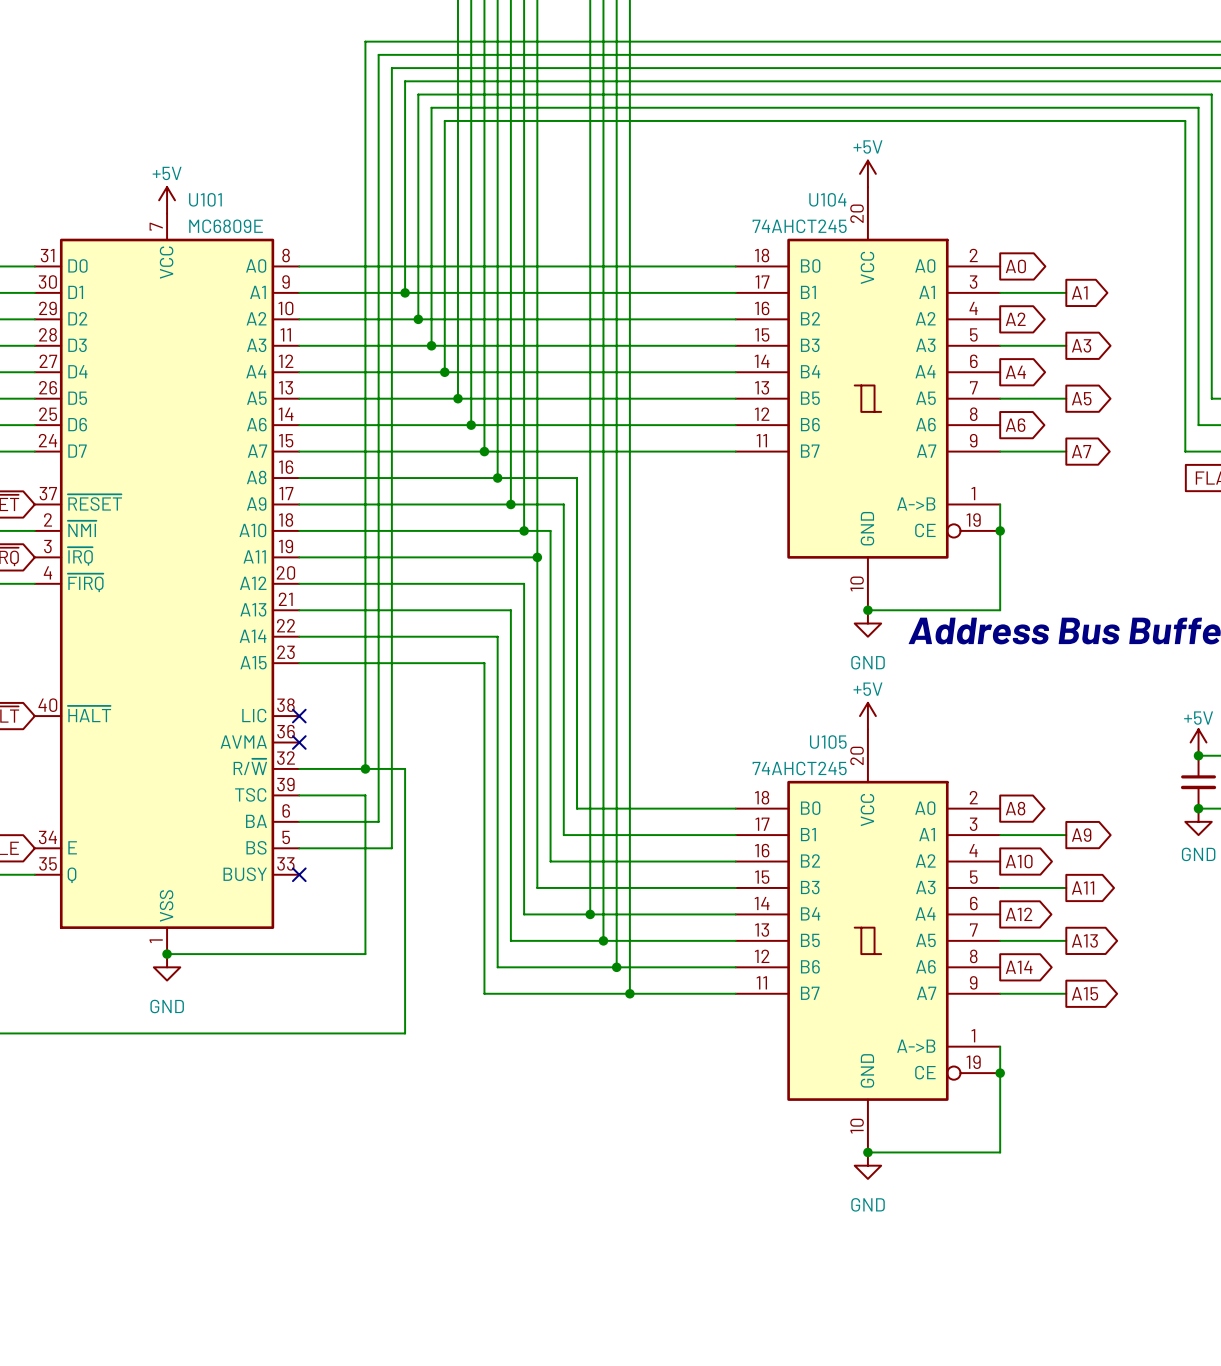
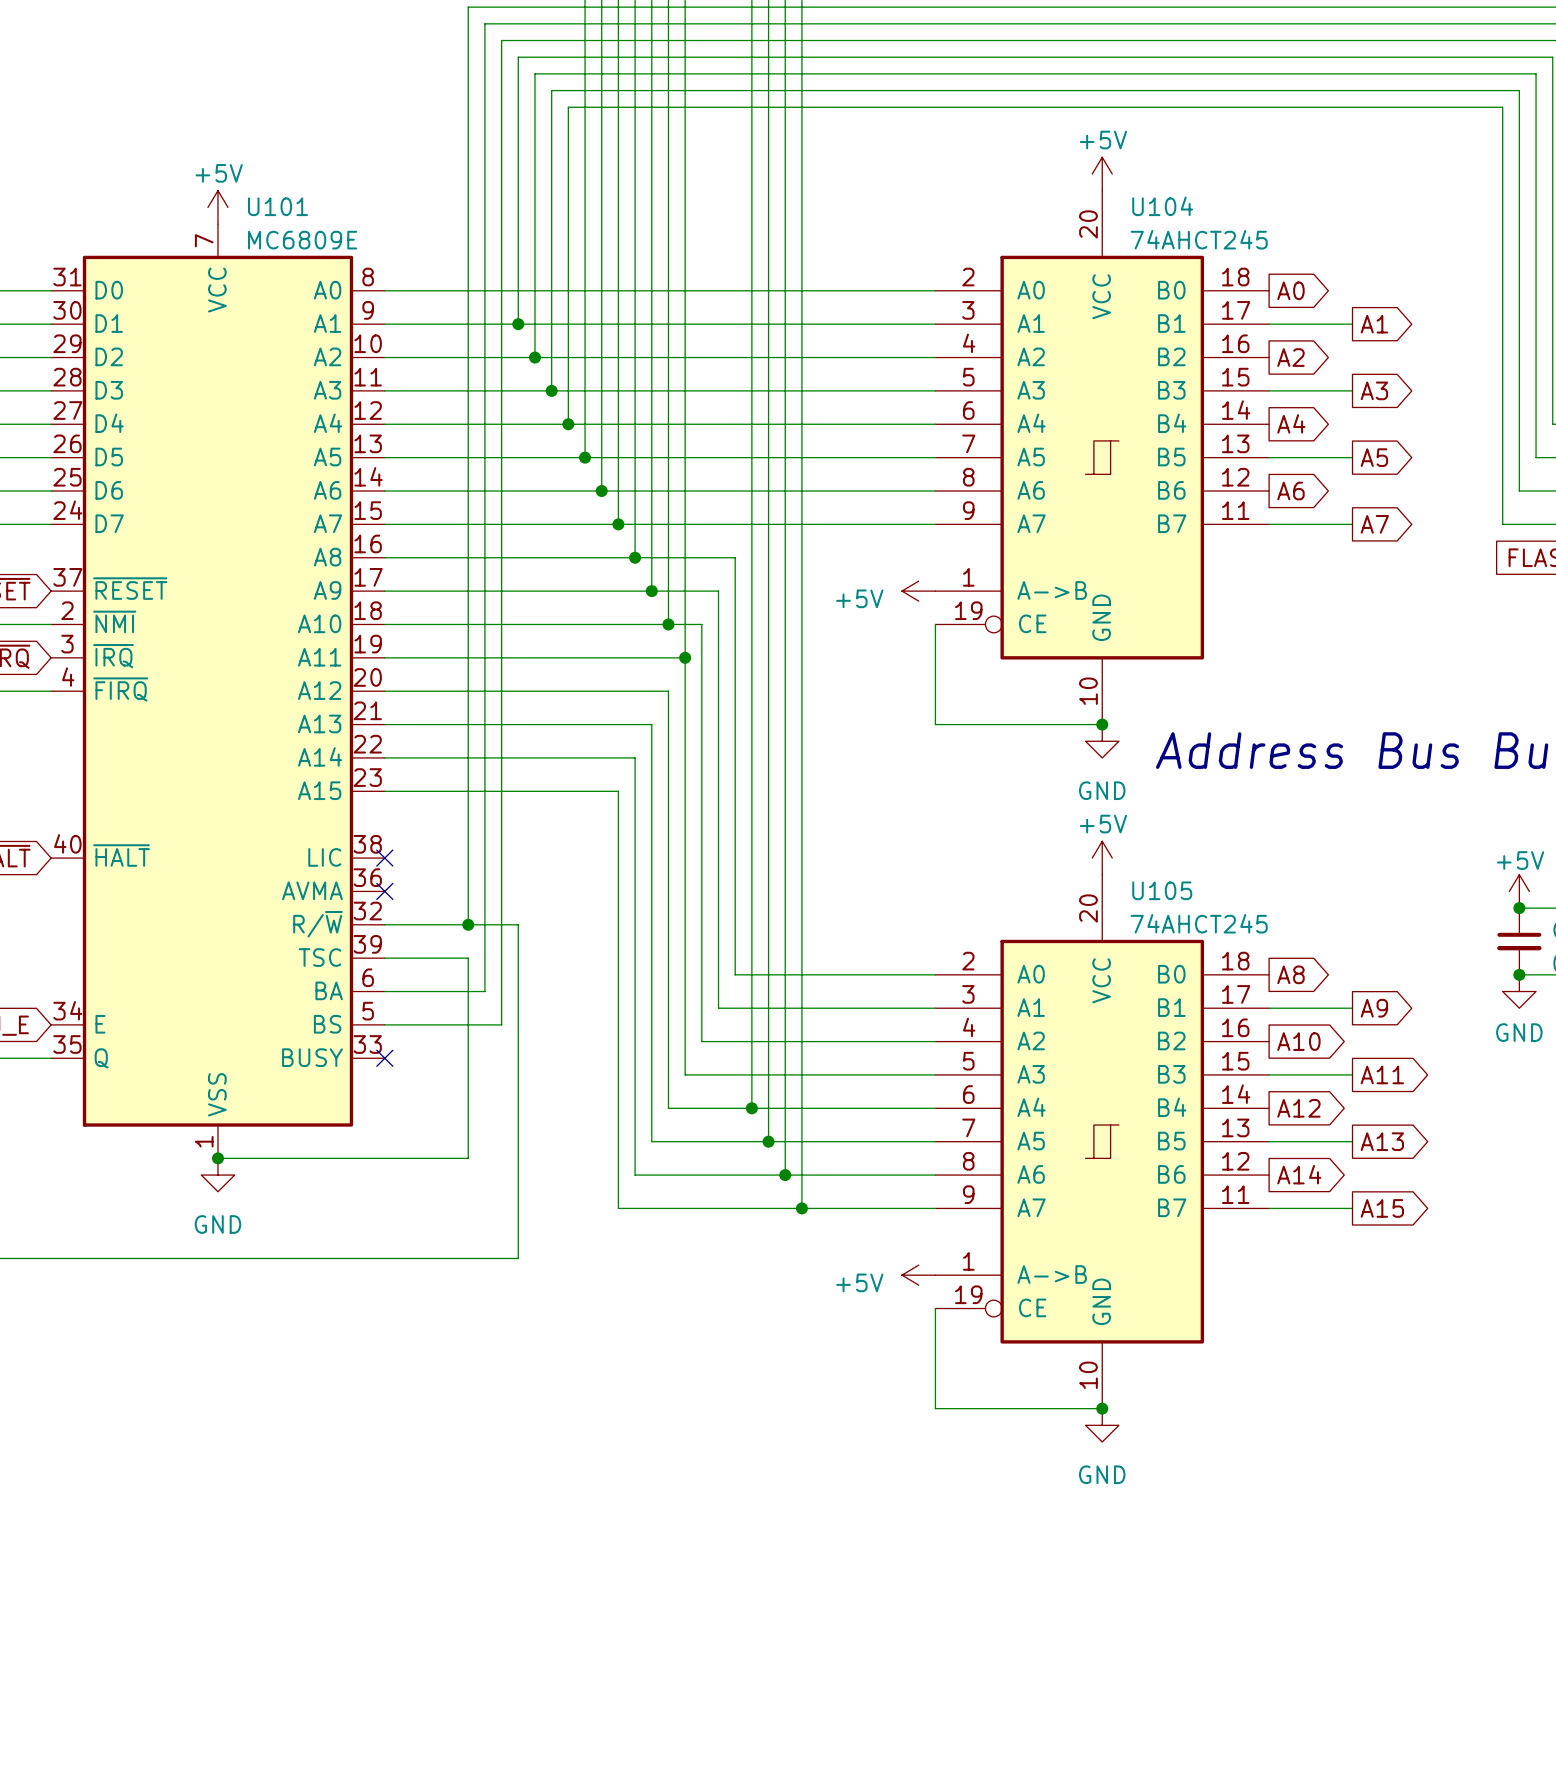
U104 flip: as is (867, 398) -> left-right (1102, 457)
power symbol: none -> +5V (918, 591)
wire: (1000, 504) (1000, 610) (867, 610) -> (935, 624) (935, 724) (1102, 724)
junction: (1000, 530) -> none
U105 flip: as is (867, 940) -> left-right (1102, 1141)
power symbol: none -> +5V (918, 1275)
wire: (1000, 1046) (1000, 1152) (867, 1152) -> (935, 1308) (935, 1408) (1102, 1408)
junction: (1000, 1073) -> none

